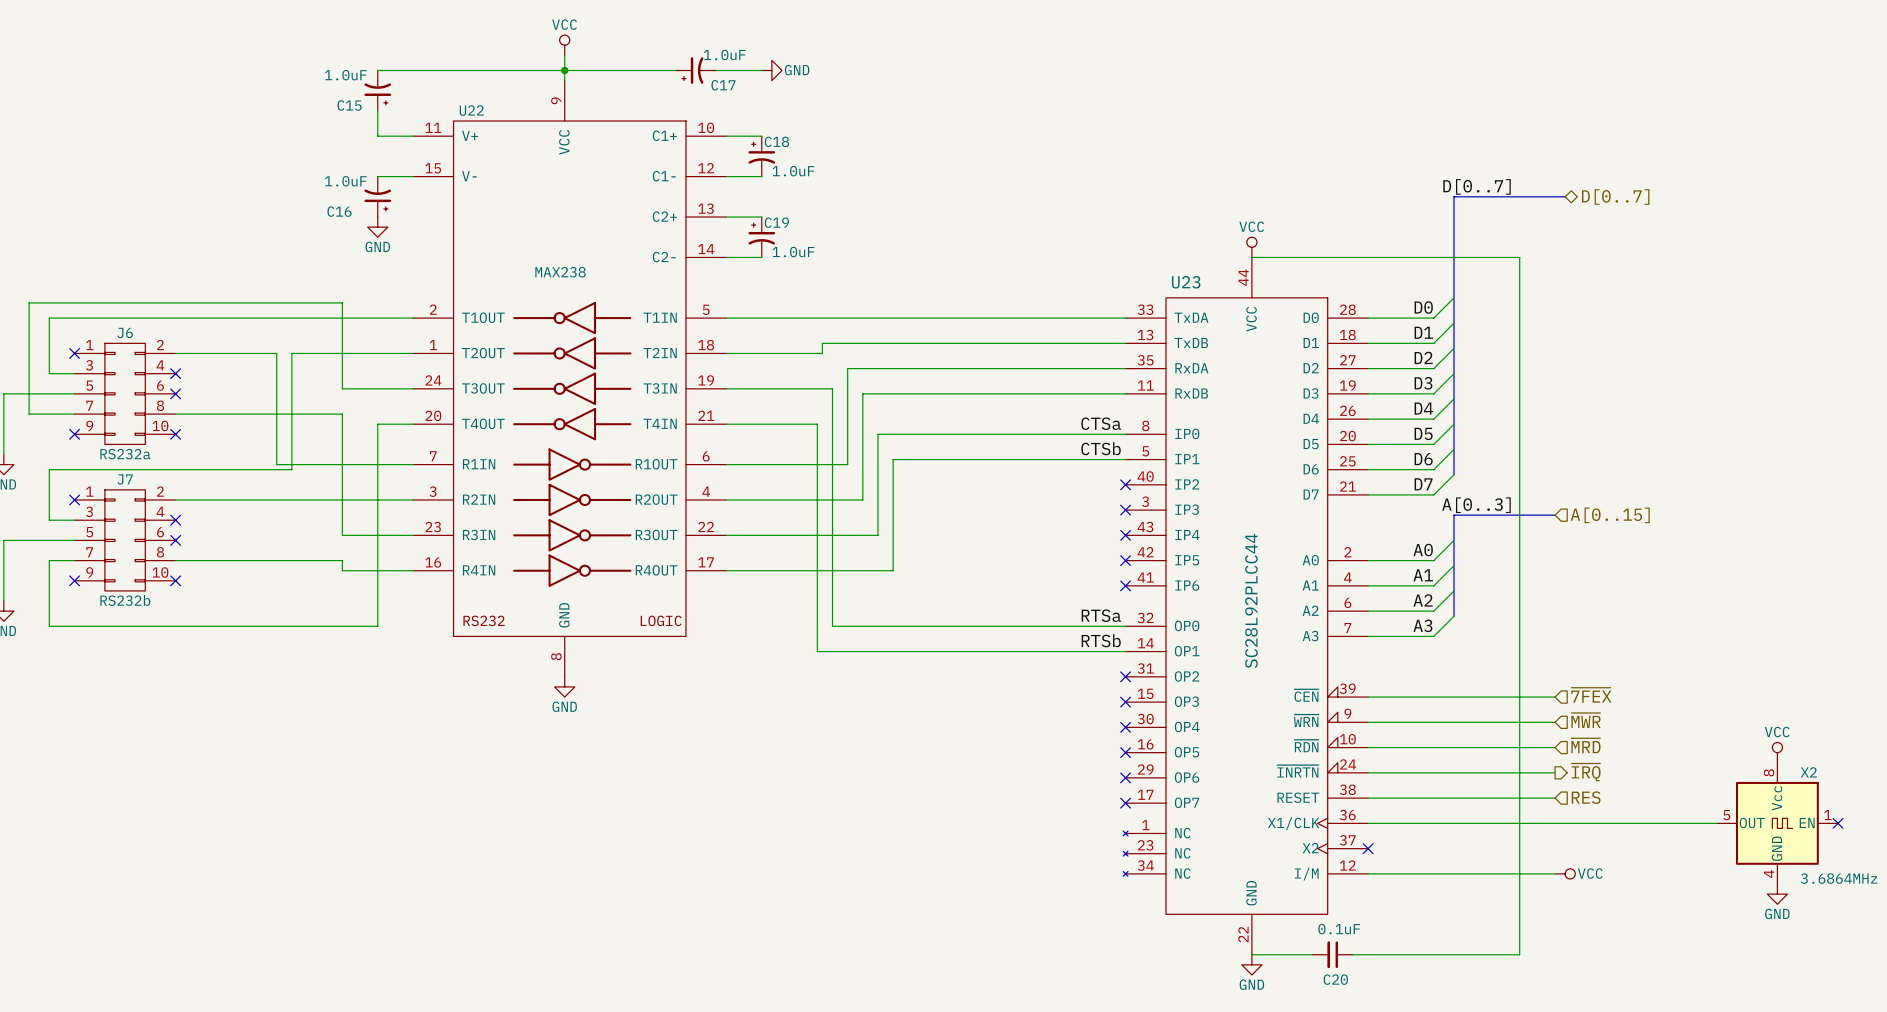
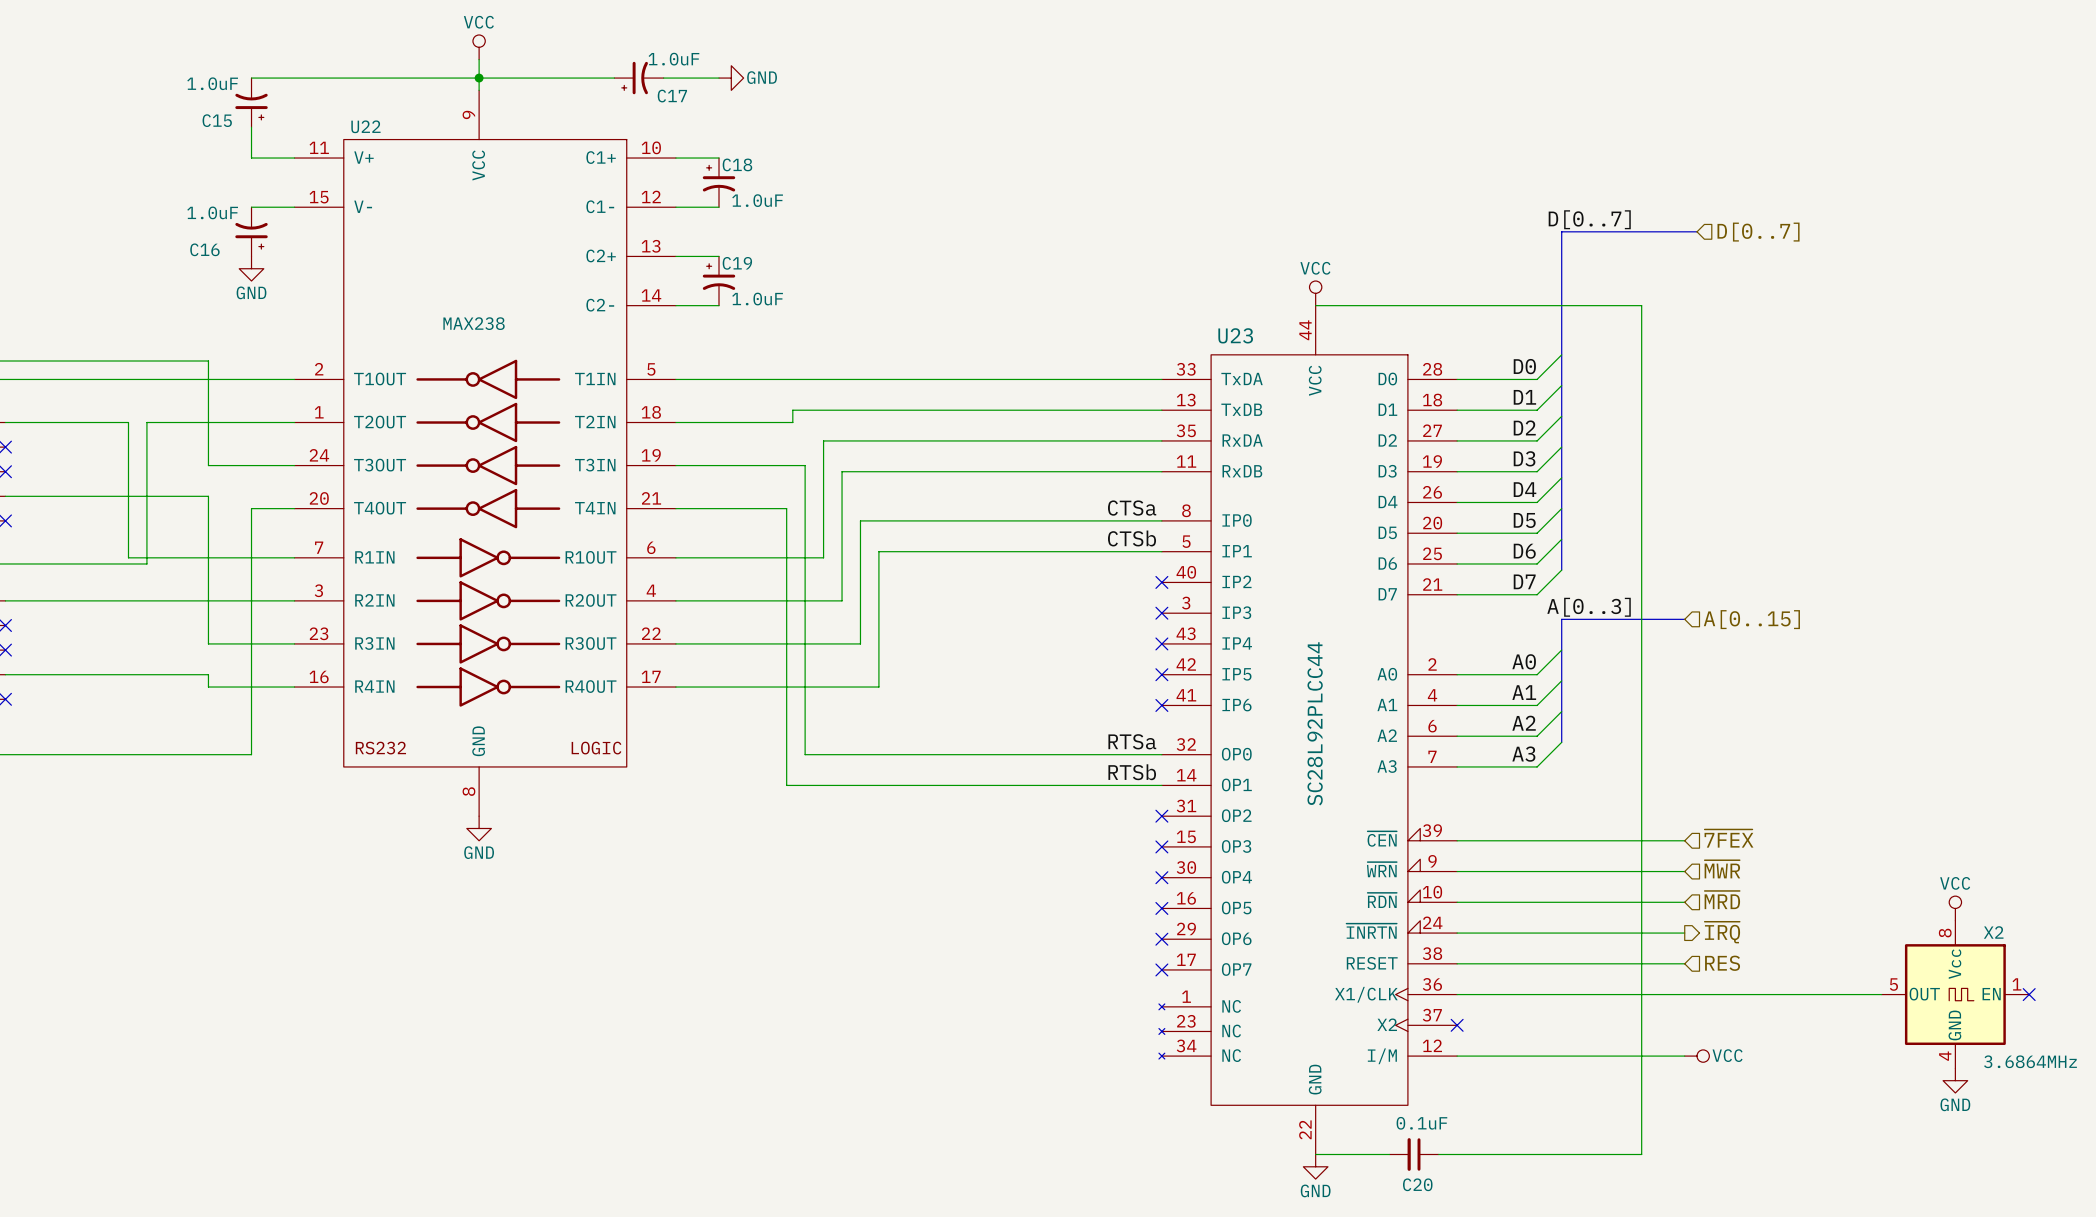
hierarchical label shape: bidirectional (1615, 197) -> input (1758, 232)

